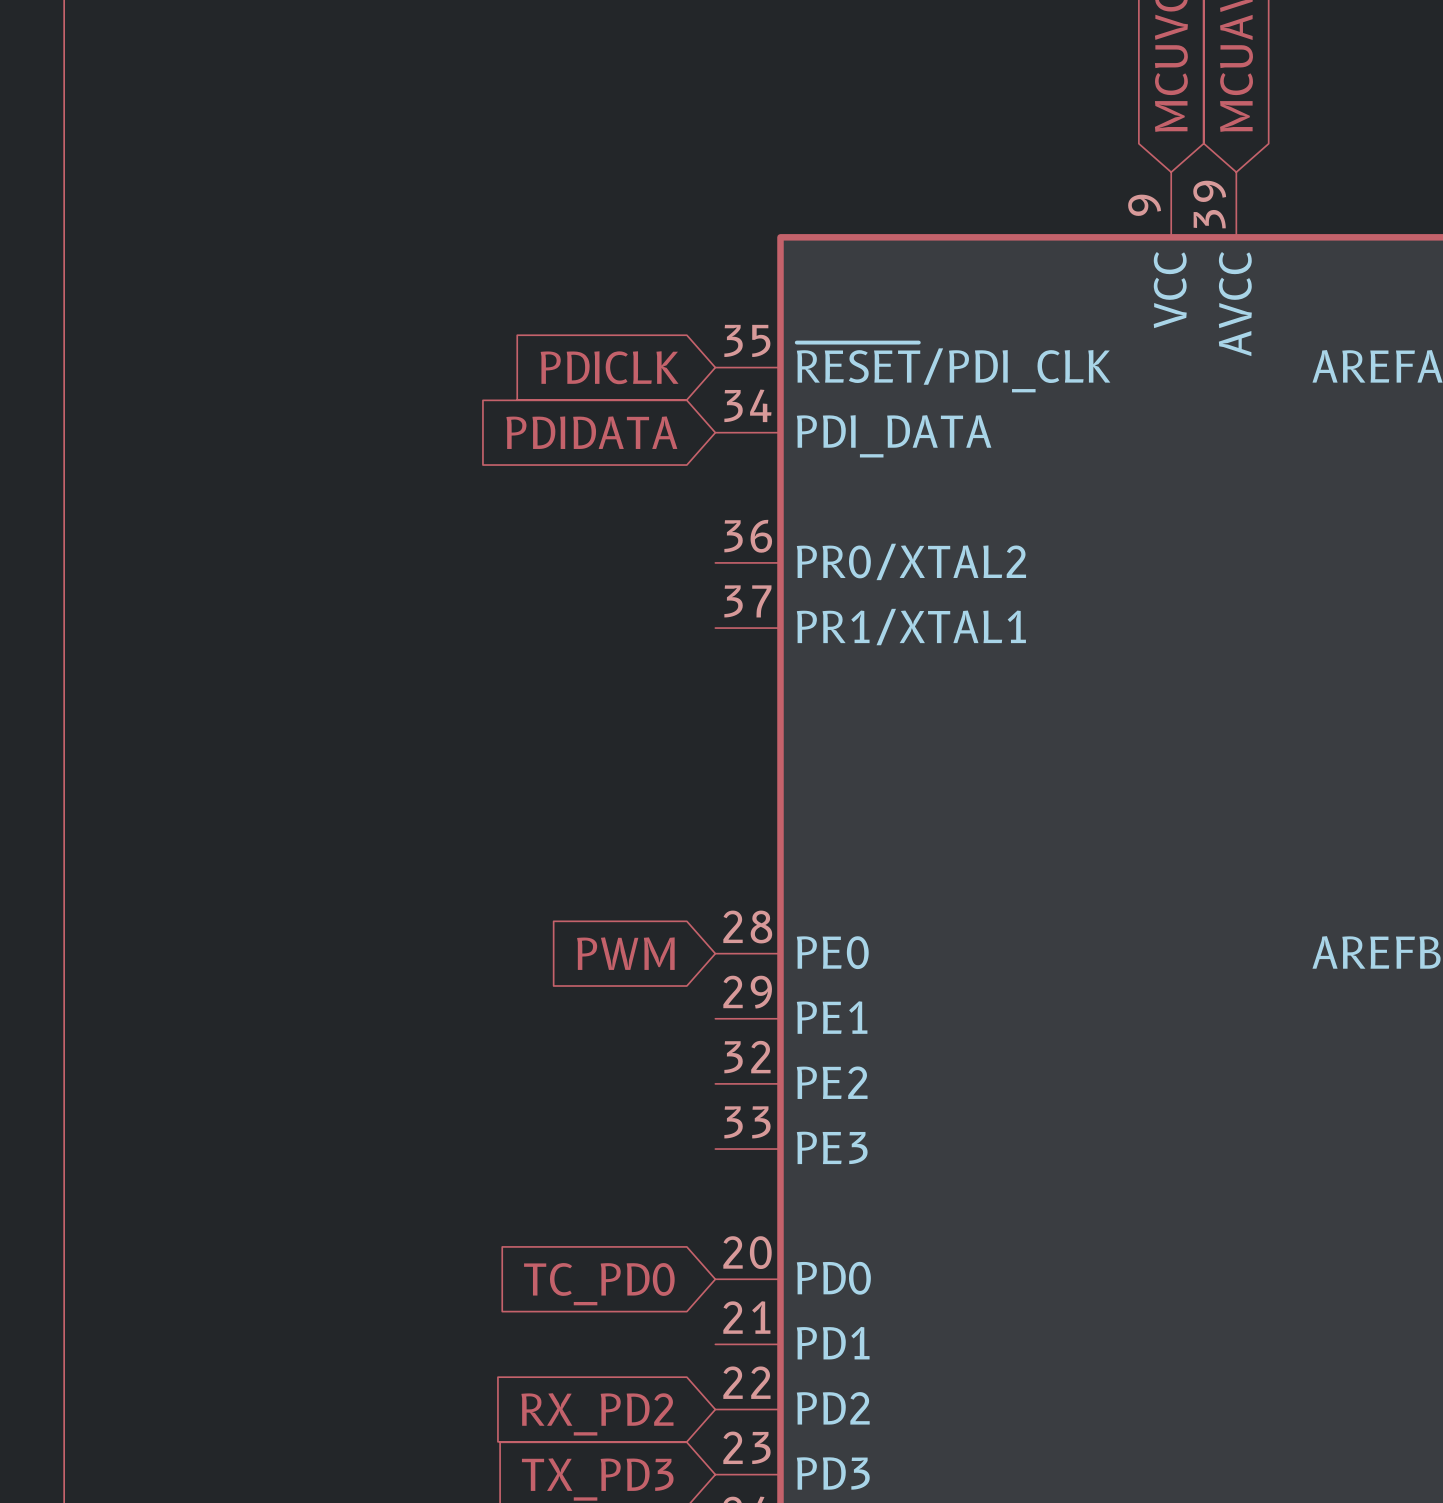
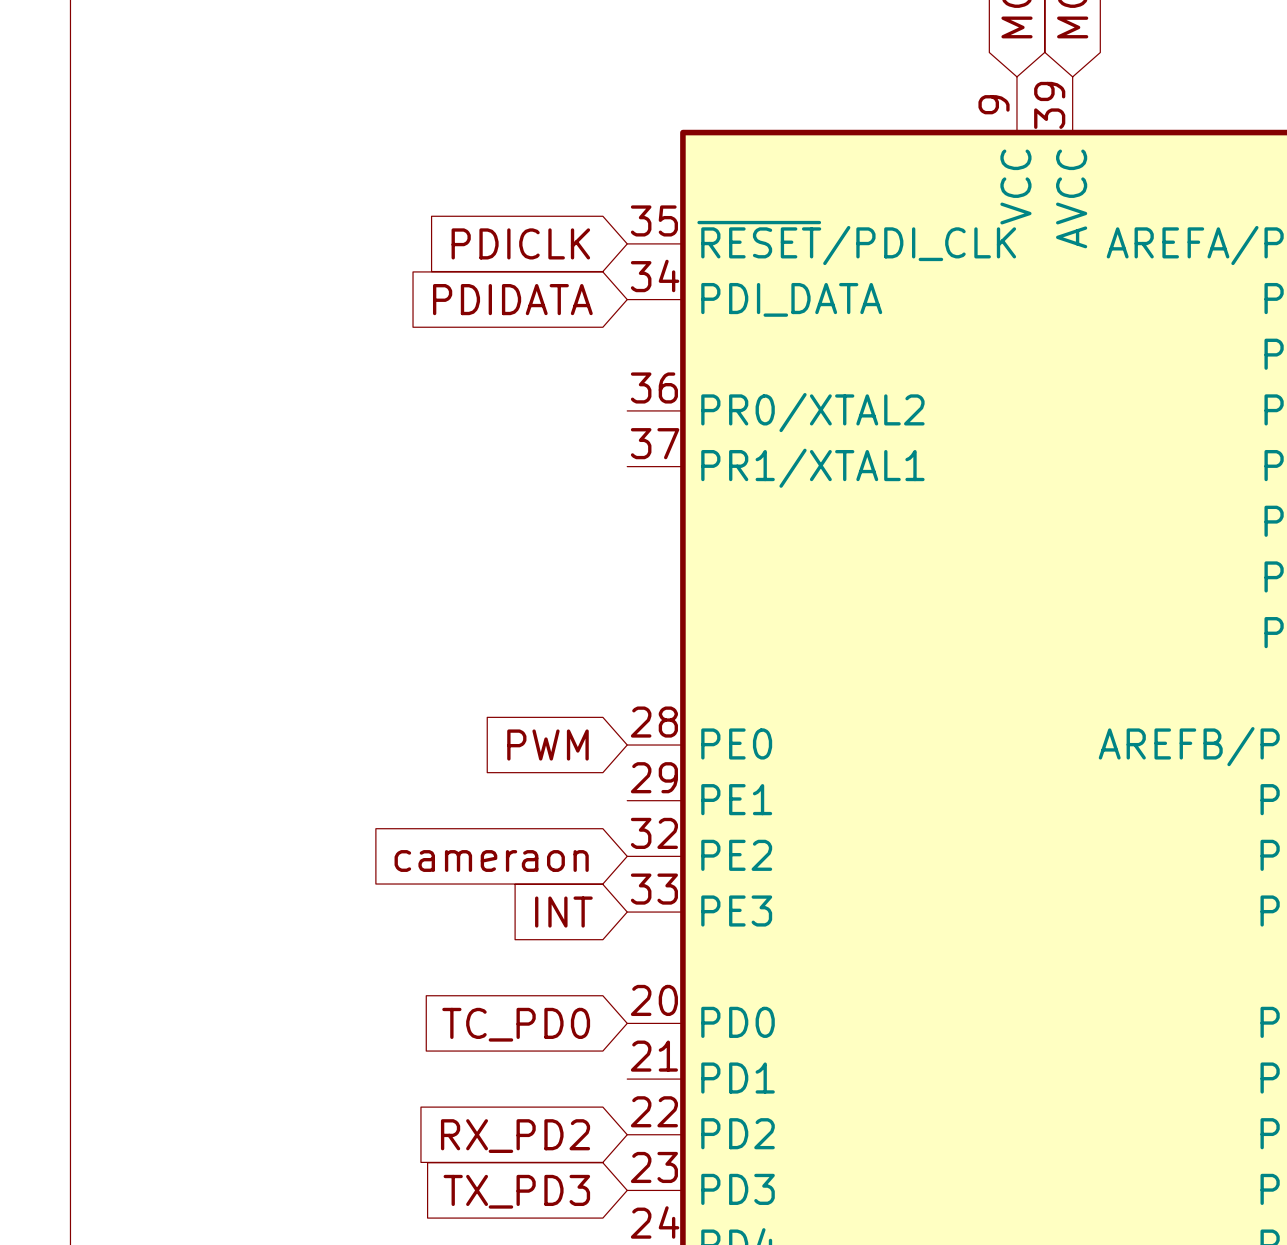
global label: none -> cameraon (491, 861)
global label: none -> INT (563, 912)

